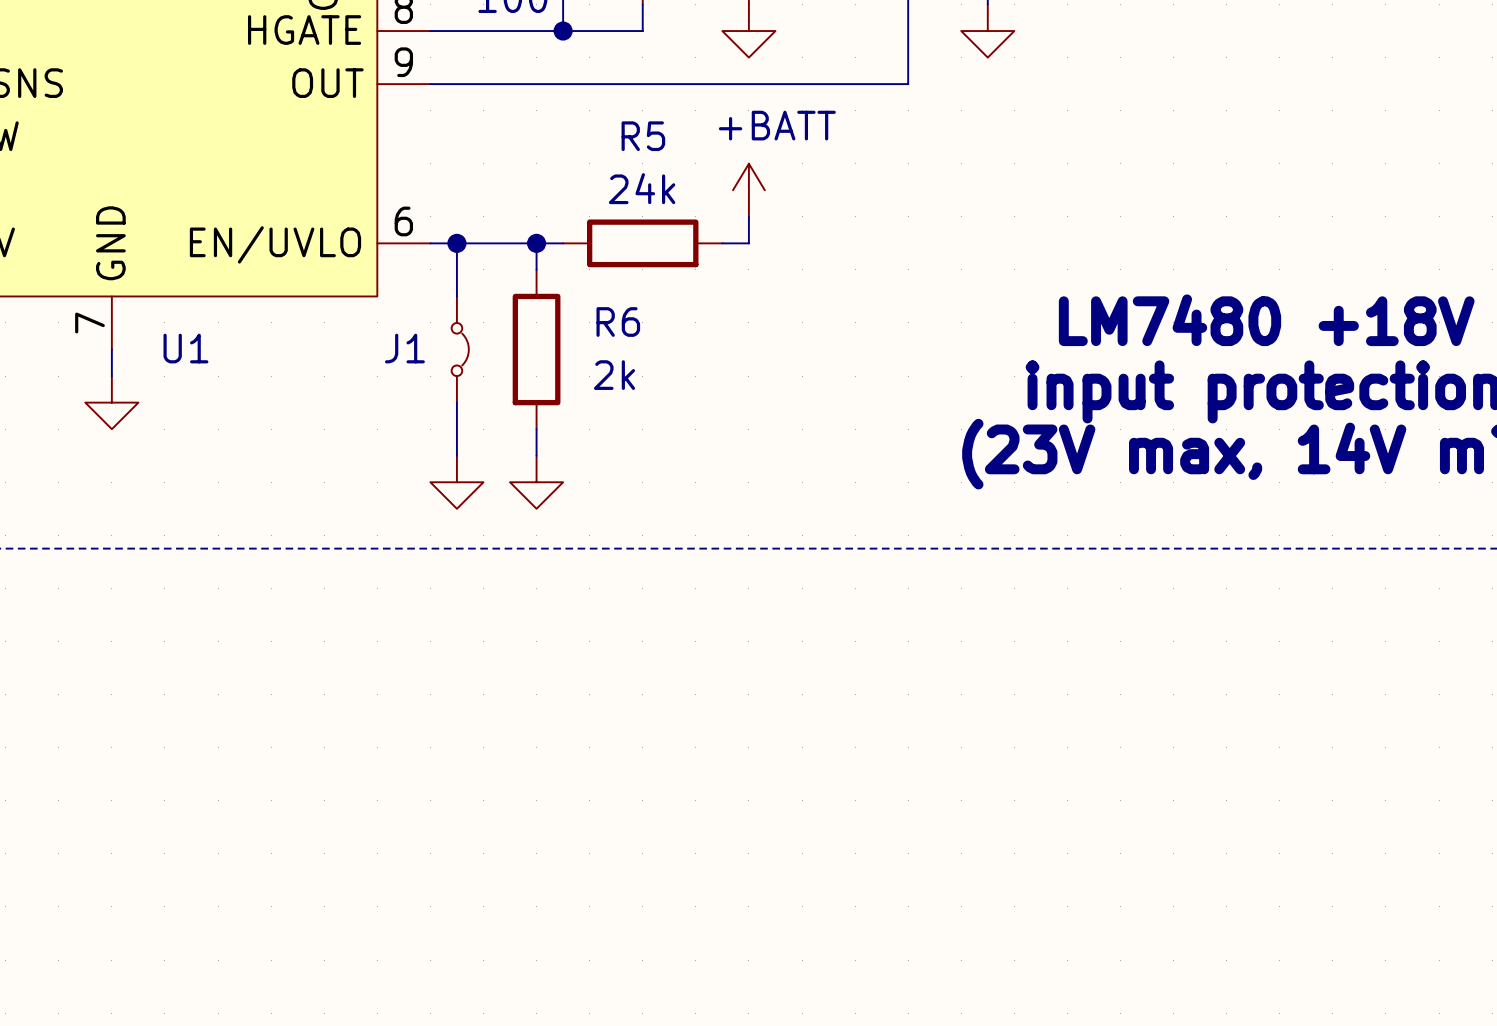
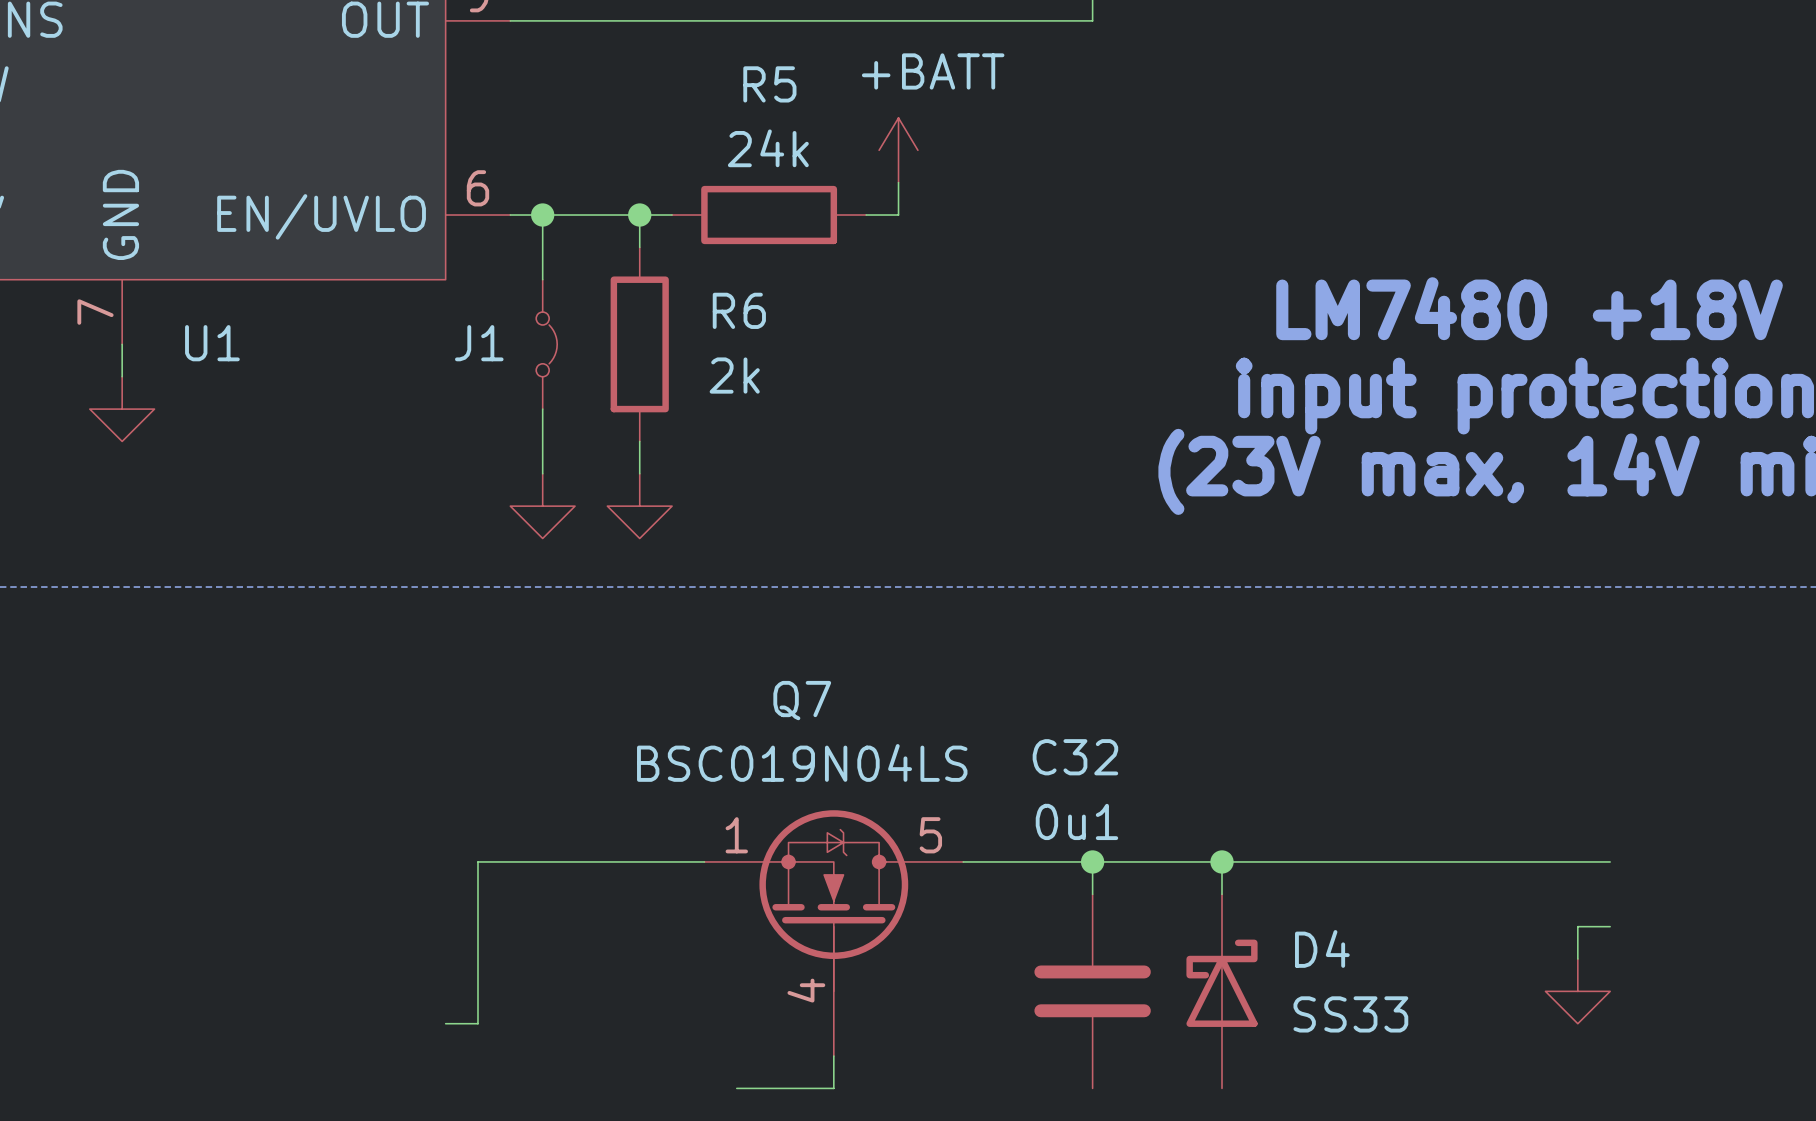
wire: none -> (704, 861) (477, 861) (477, 1023) (445, 1023)
wire: none -> (963, 861) (1610, 861)
wire: none -> (1092, 861) (1092, 894)
junction: none -> (1092, 861)
wire: none -> (1222, 861) (1222, 894)
junction: none -> (1222, 861)
wire: none -> (1610, 926) (1577, 926) (1577, 959)
Q7: none -> BSC019N04LS (833, 933)
C32: none -> 0u1 (1092, 991)
D4: none -> SS33 (1222, 991)
power symbol: none -> (1577, 991)
wire: none -> (833, 1056) (833, 1088) (736, 1088)

